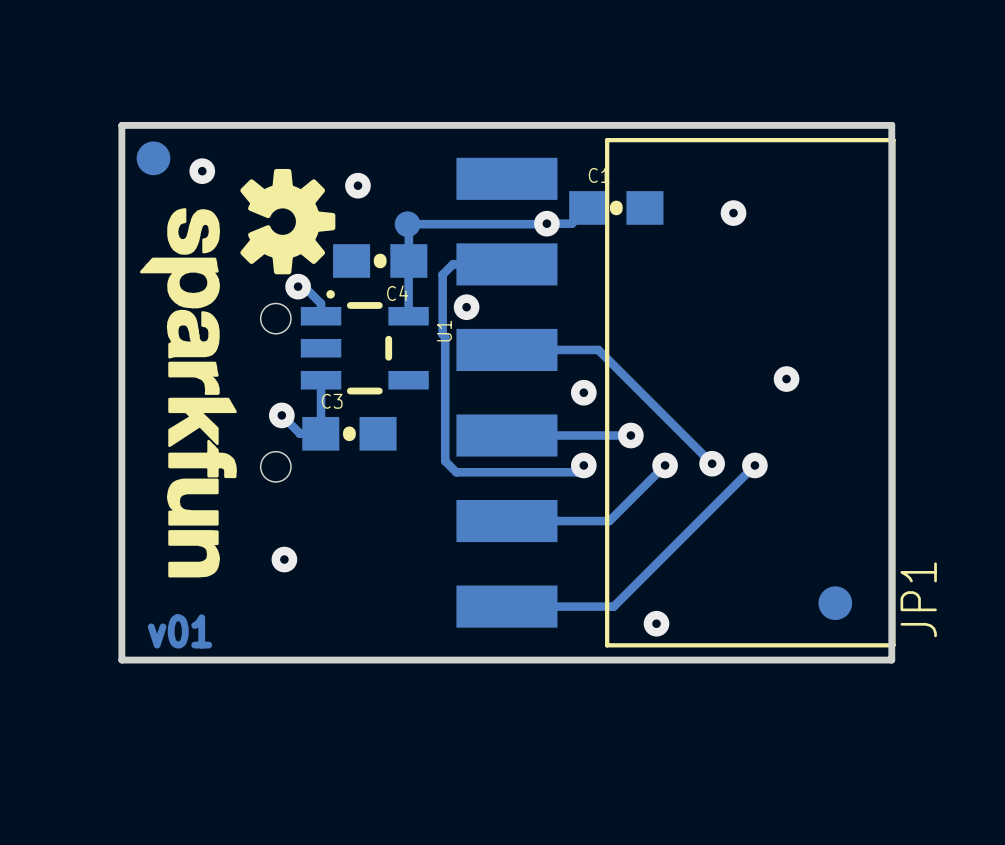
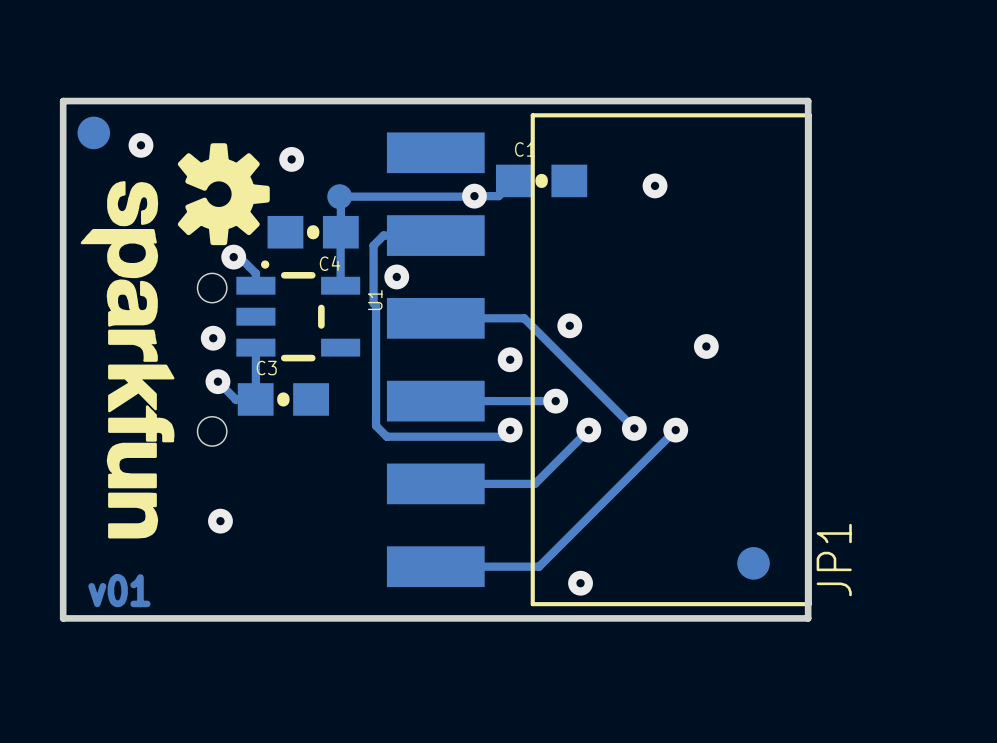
via: none -> (569, 325)
via: none -> (213, 338)

